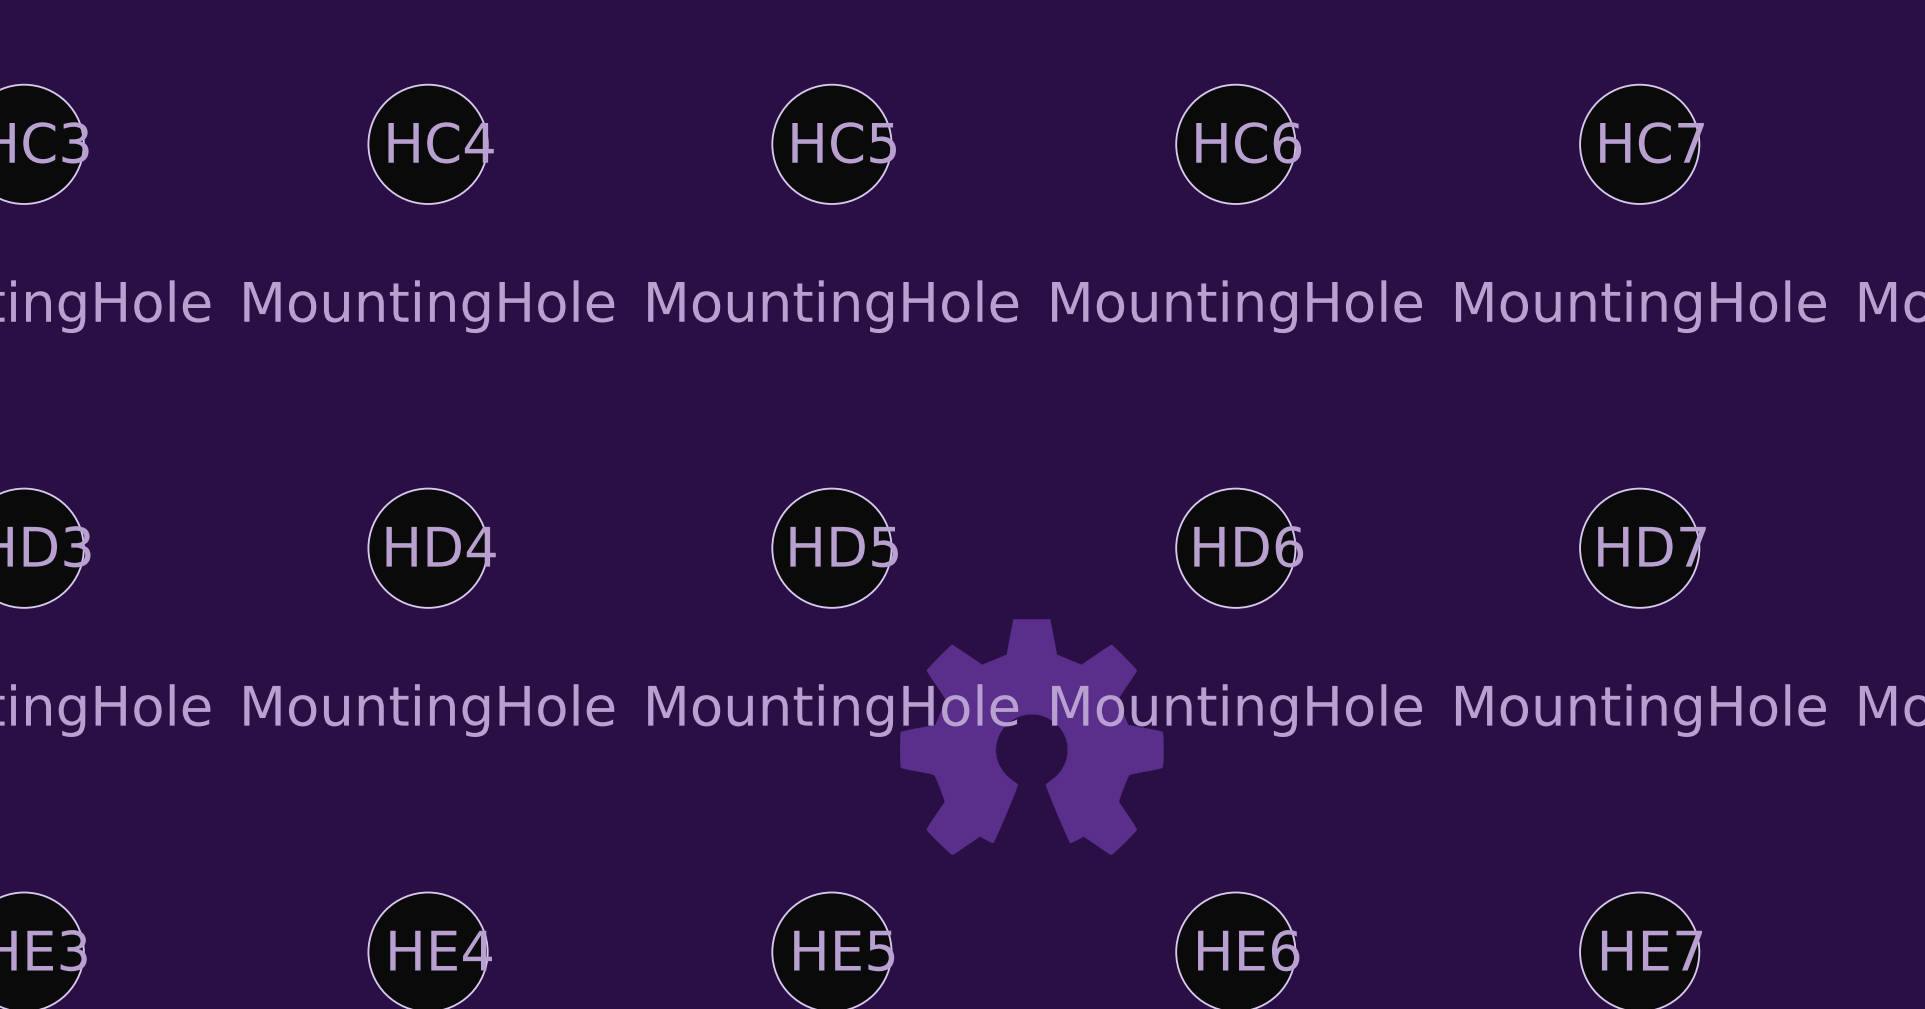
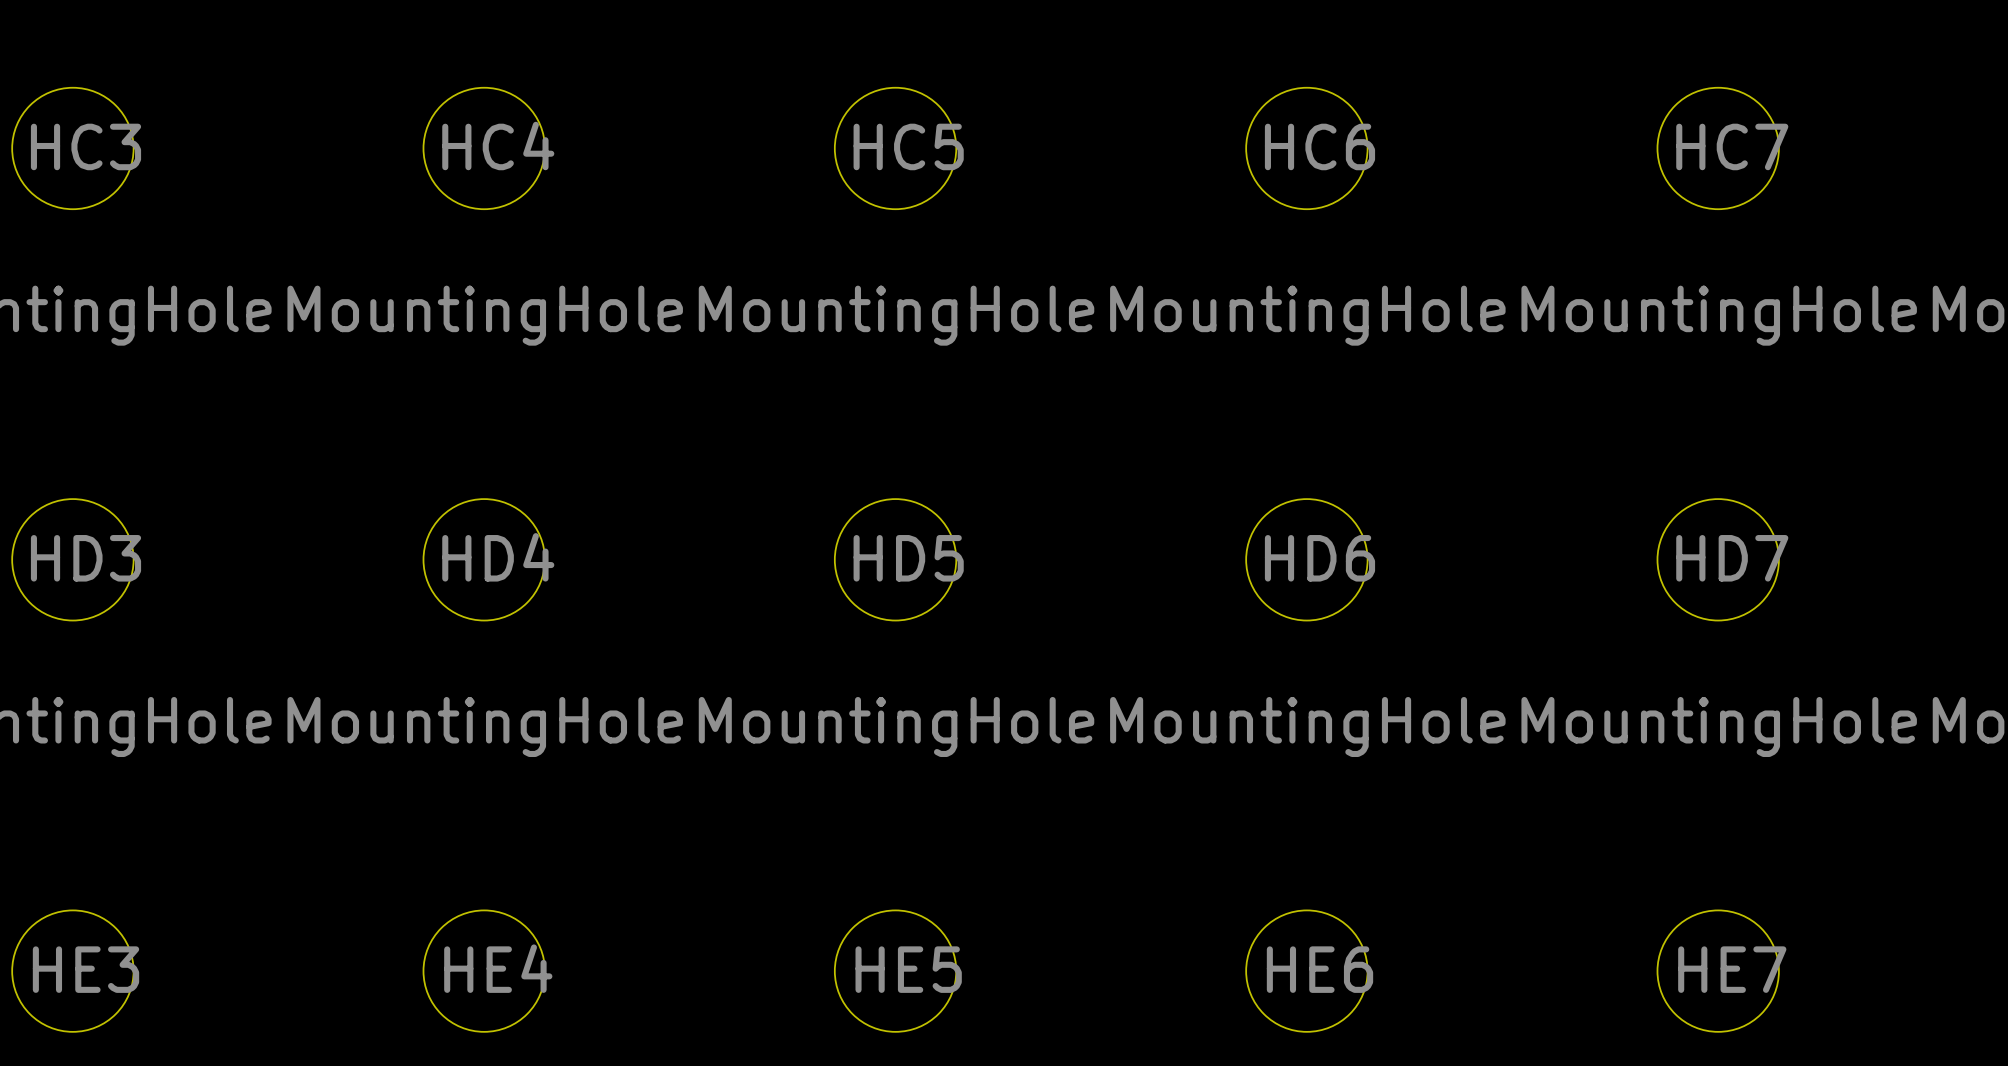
drawing: [899, 619, 1164, 856] -> none

